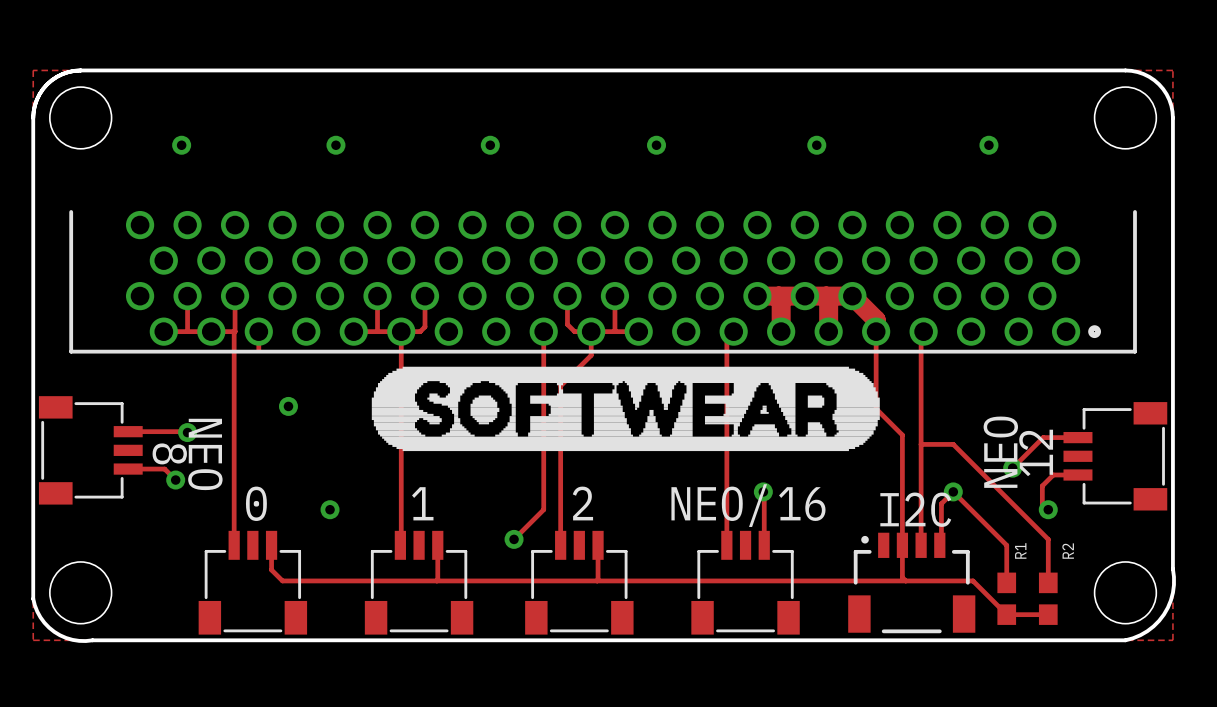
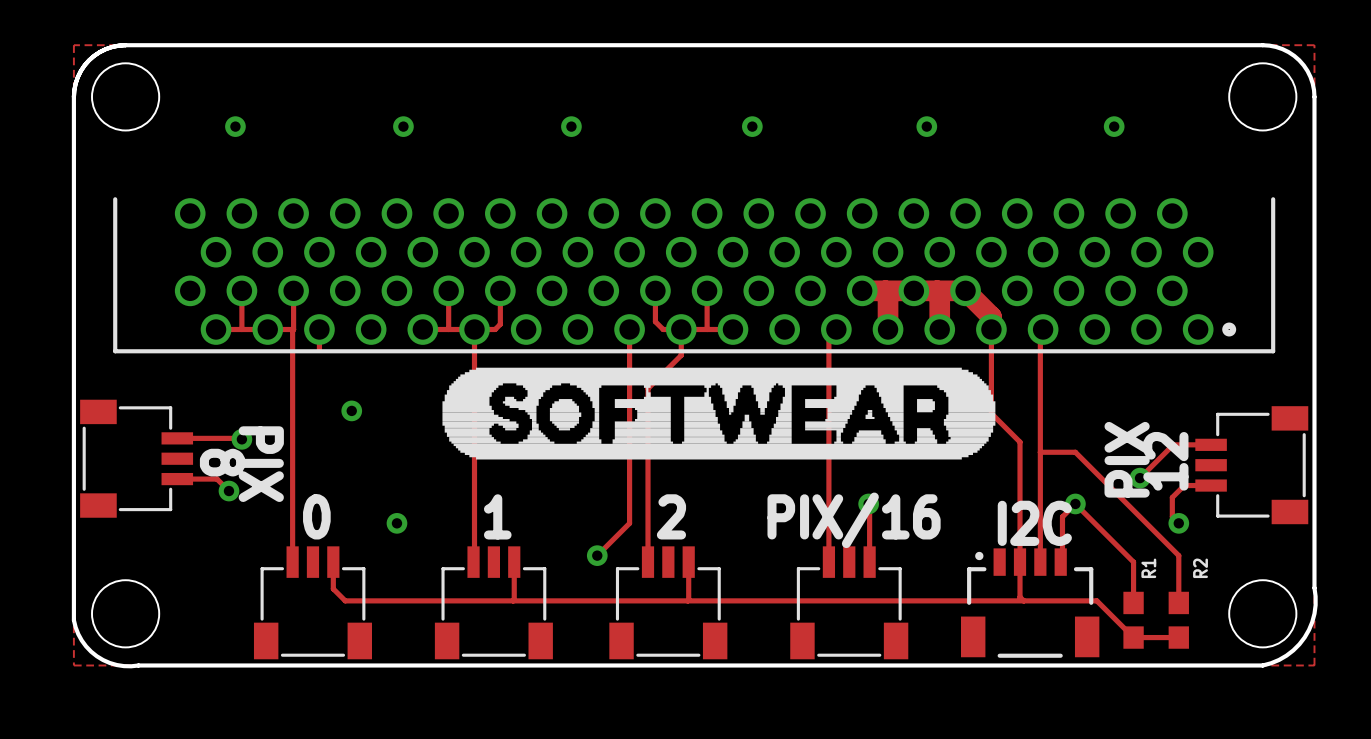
text: NEO (1000, 452) -> PIX (1127, 459)
text: NEO (205, 454) -> PIX (261, 464)
text: NEO/ (719, 505) -> PIX/ (823, 520)

